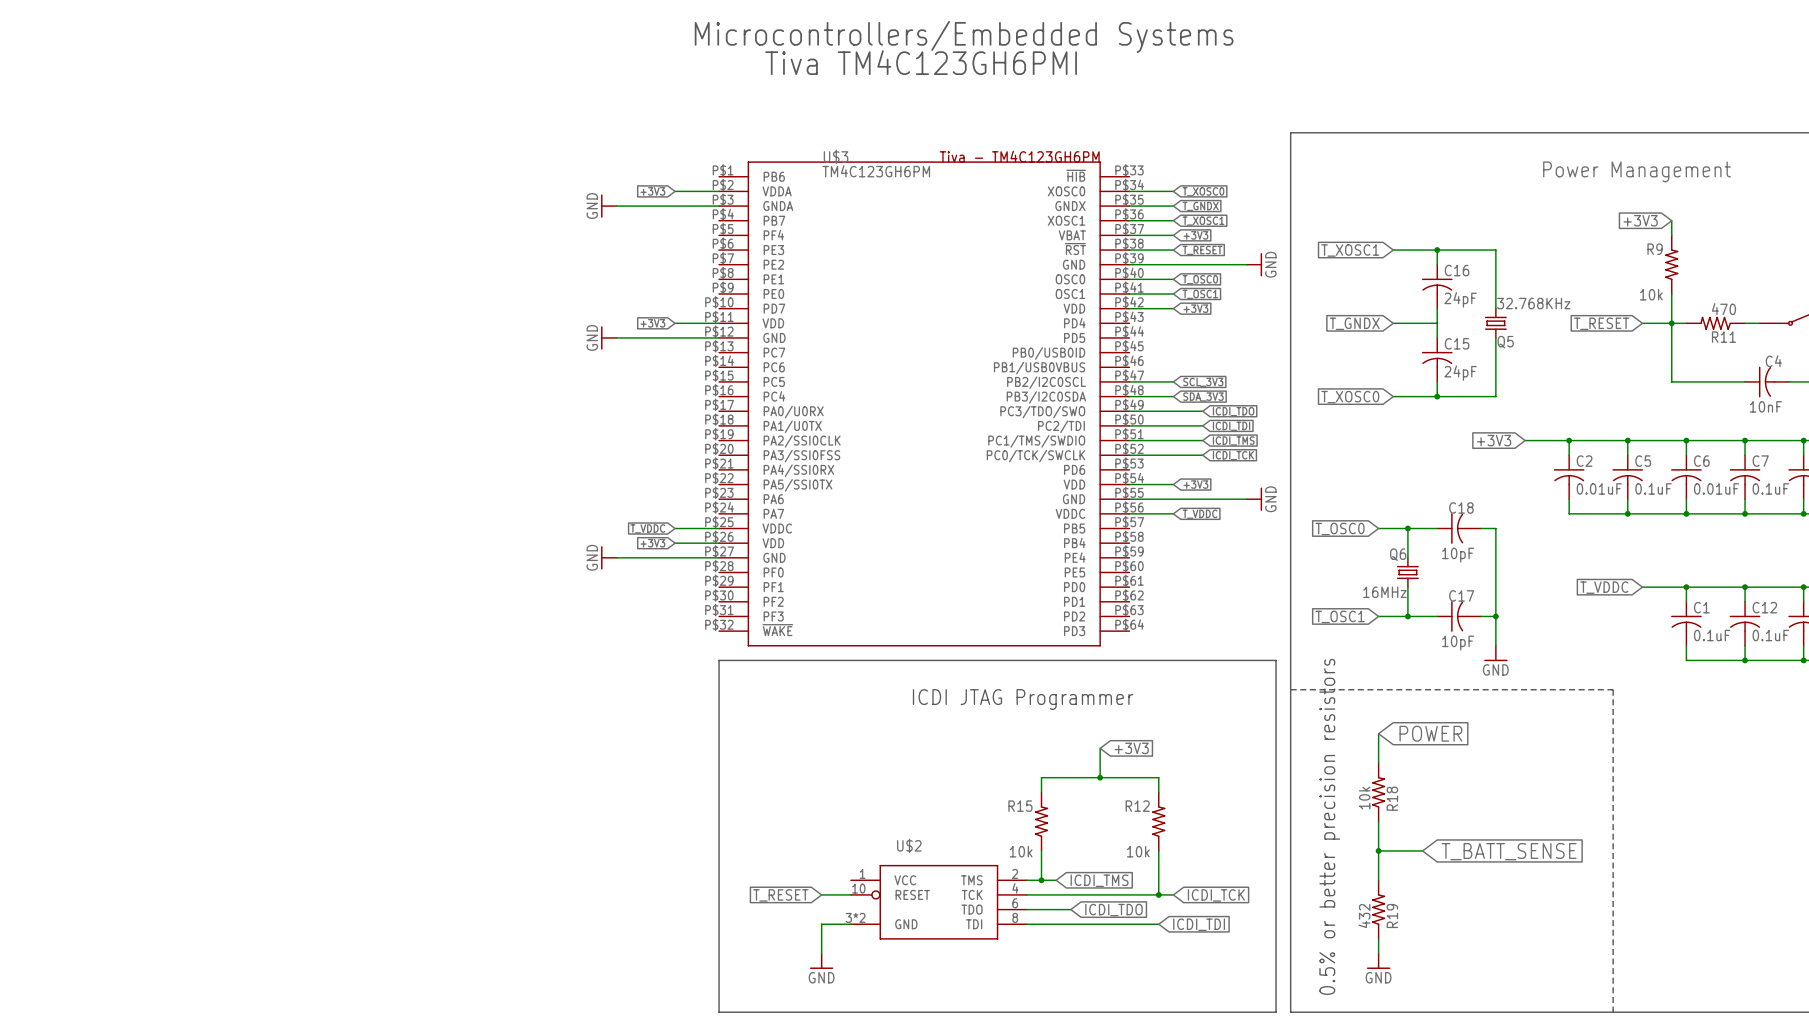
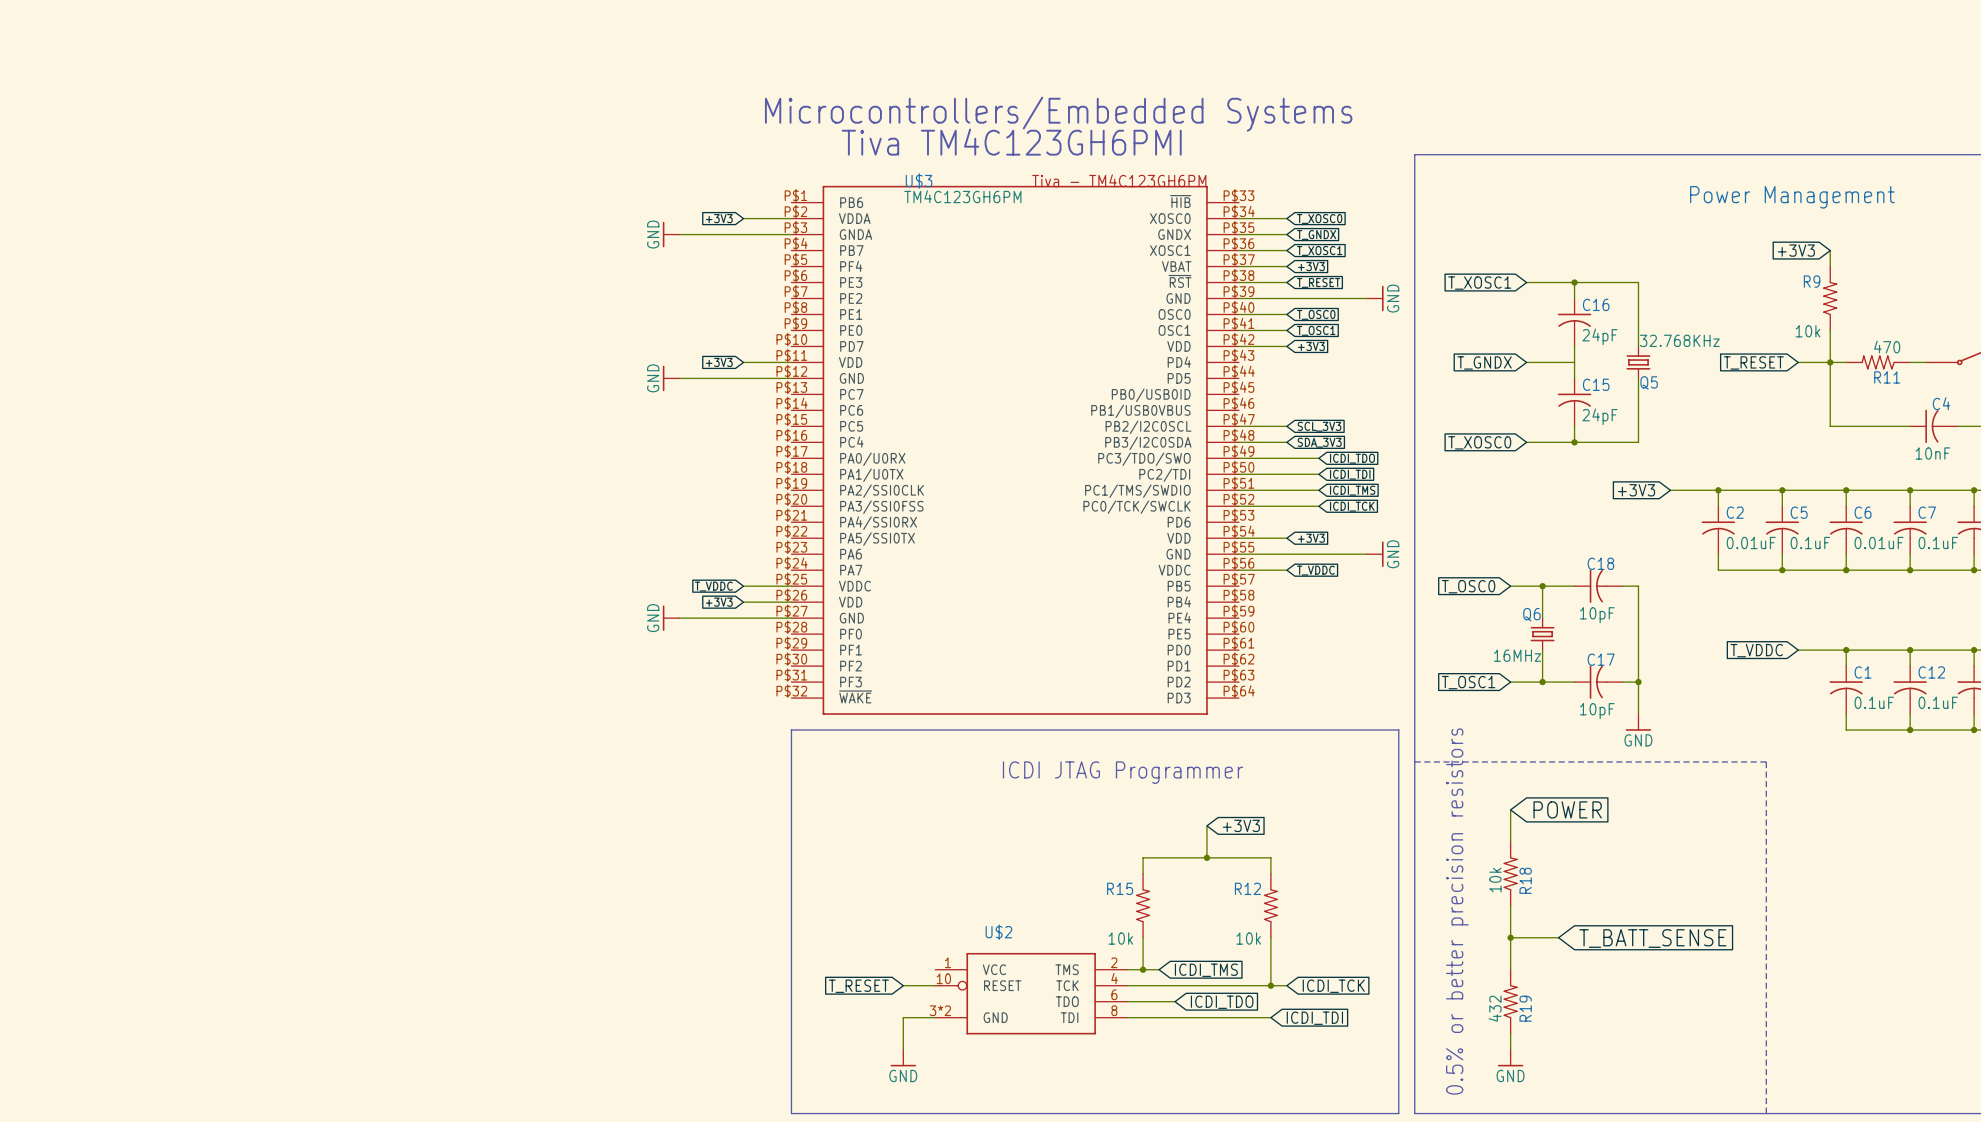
text position: Microcontrollers/Embedded Systems (964, 36) -> Microcontrollers/Embedded Systems (1058, 114)
text position: Tiva TM4C123GH6PMI (921, 62) -> Tiva TM4C123GH6PMI (1011, 142)

